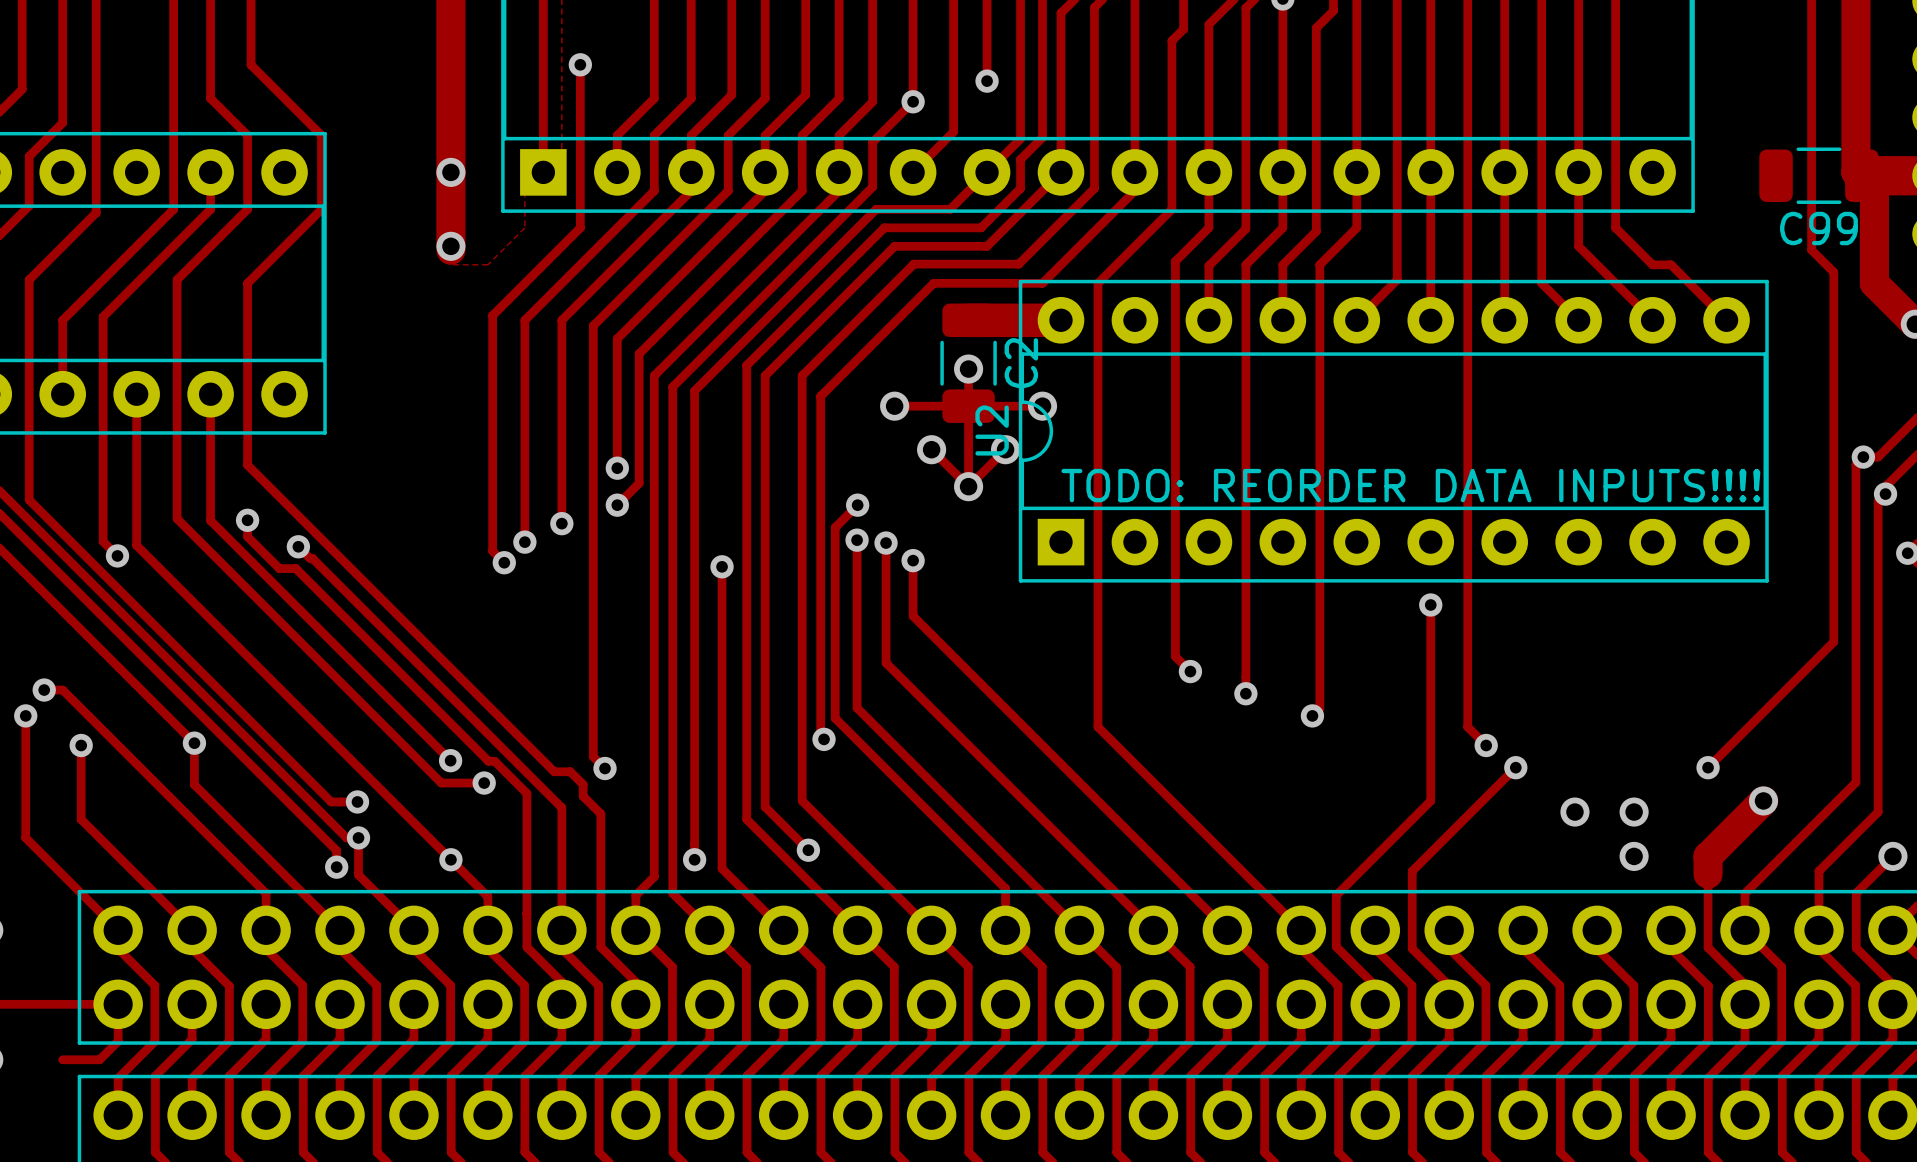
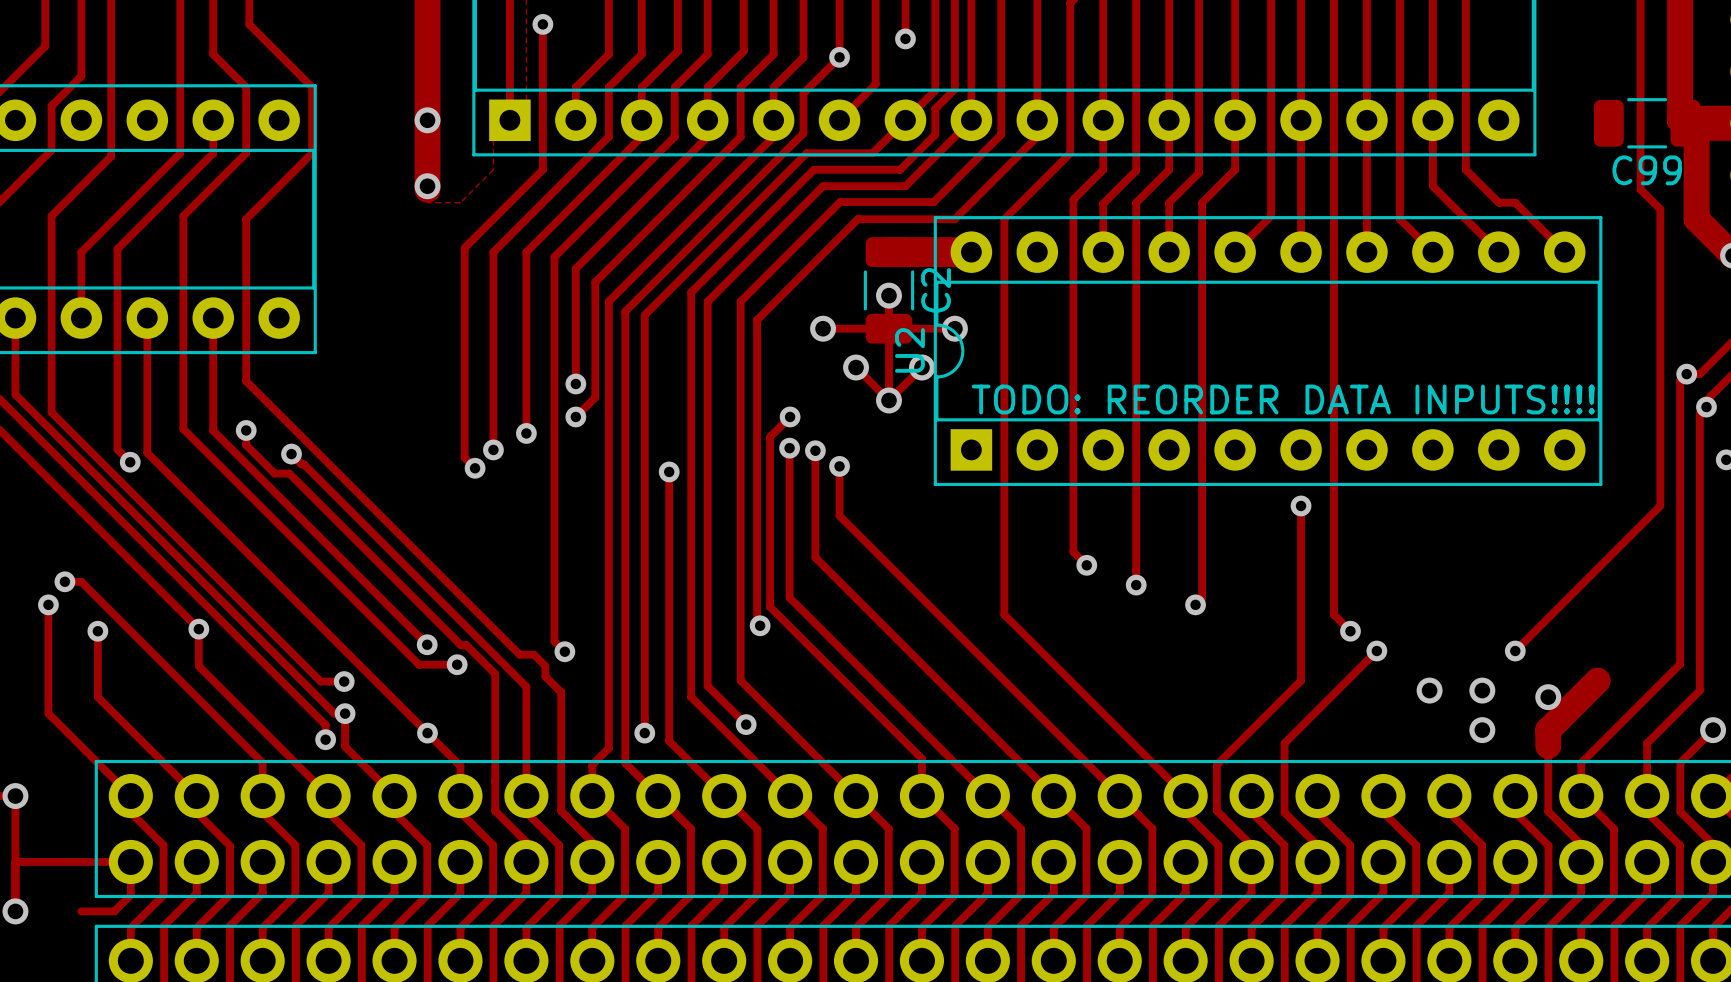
track: (1833, 604) (1833, 641) (1708, 767) -> (1660, 505) (1515, 651)
via position: (1708, 767) -> (1515, 651)
via position: (1763, 800) -> (1548, 697)

